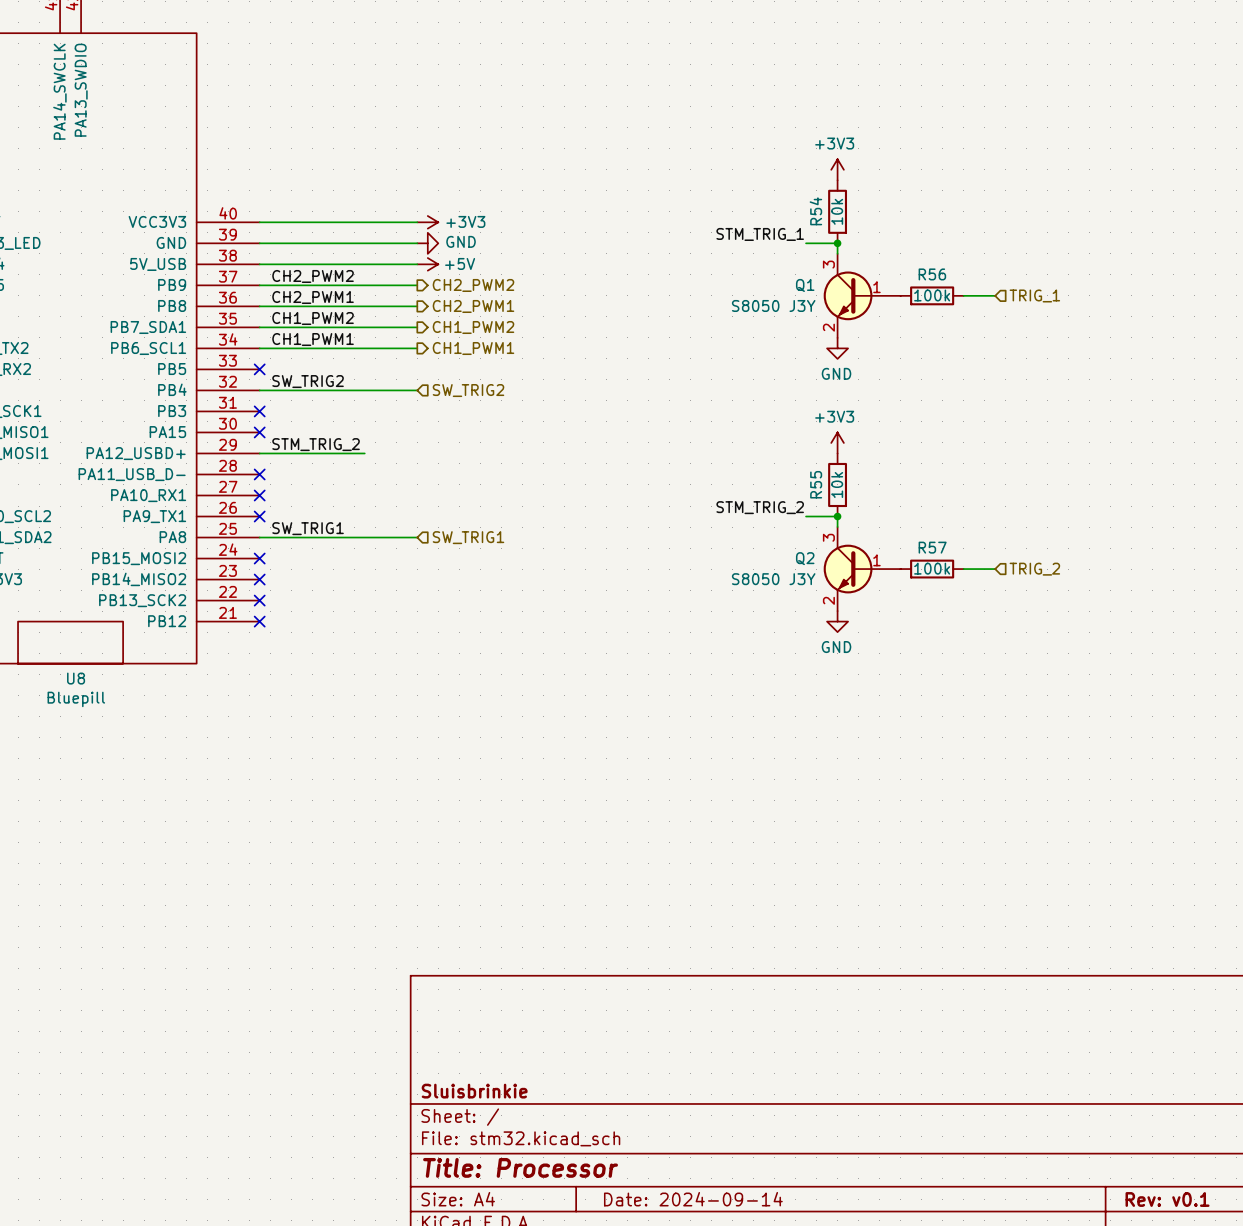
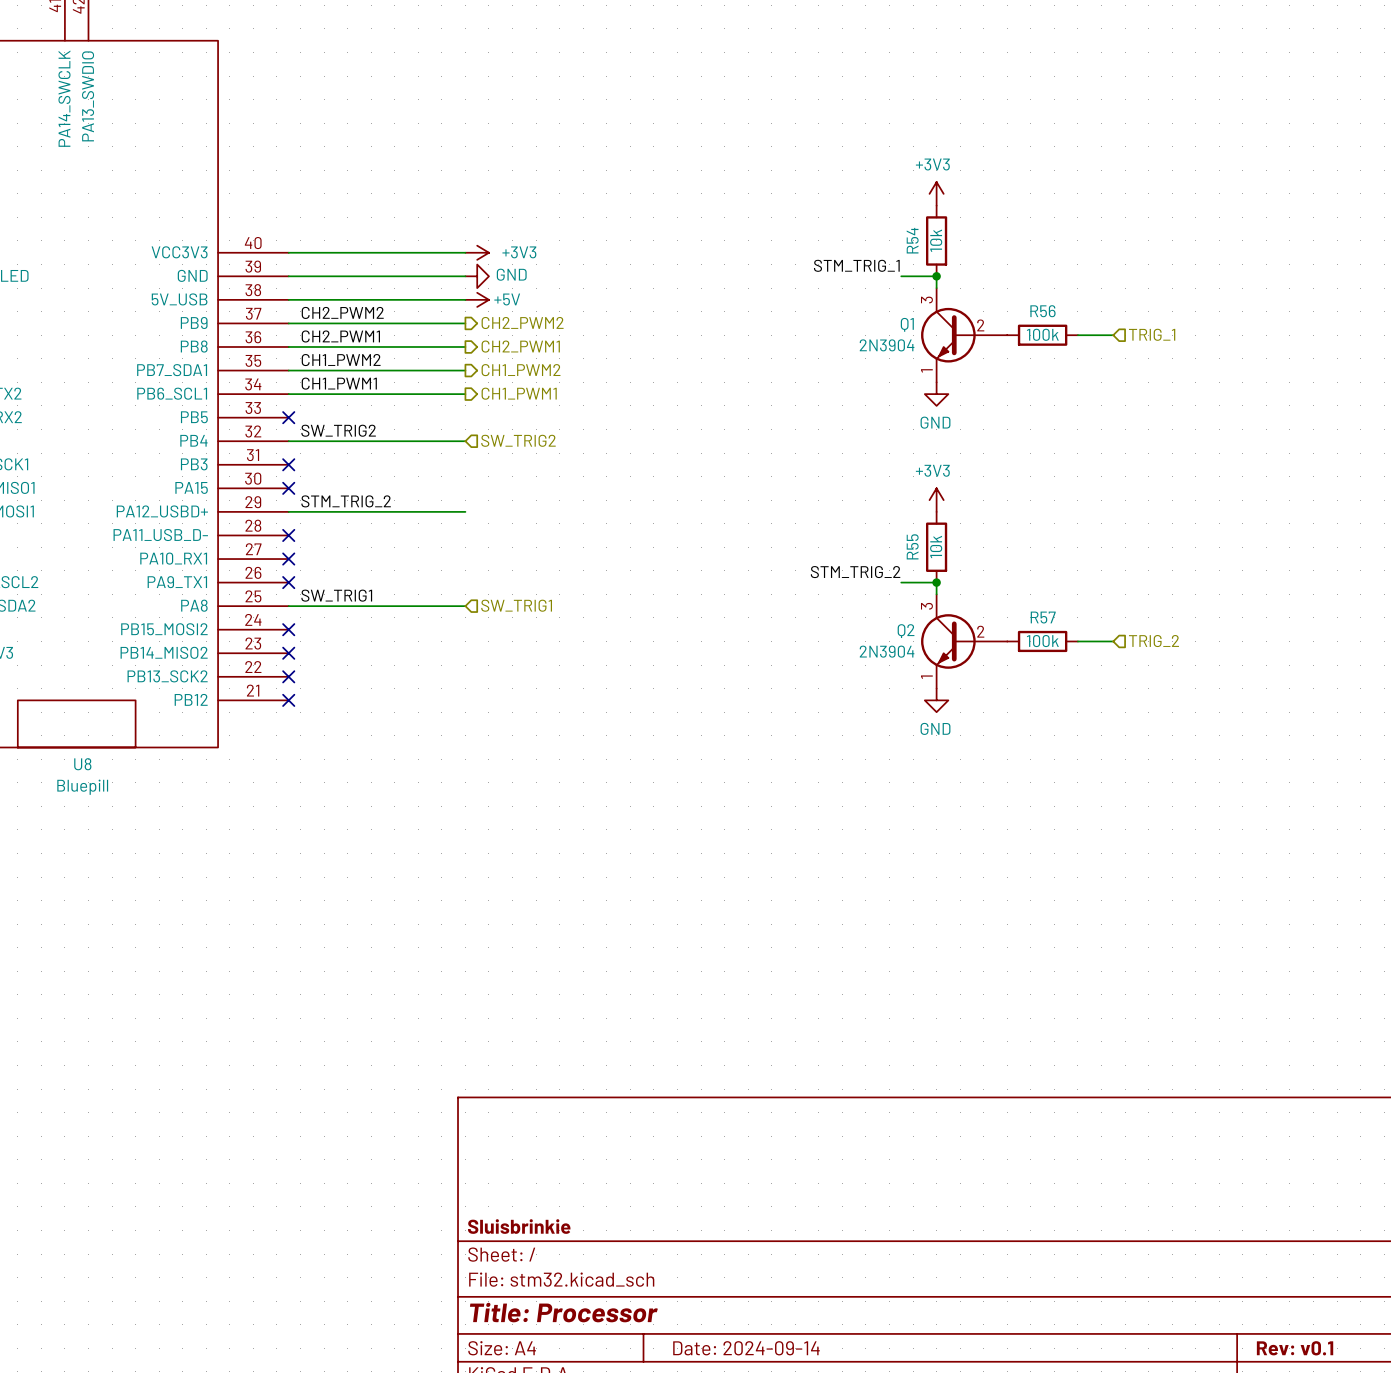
Q1 symbol: [823, 253, 901, 338] -> [921, 288, 1008, 383]
Q1 value: S8050 J3Y (773, 305) -> 2N3904 (887, 345)
wire: none -> (406, 511) (465, 511)
Q2 symbol: [823, 527, 901, 612] -> [921, 594, 1008, 689]
Q2 value: S8050 J3Y (773, 579) -> 2N3904 (887, 651)

